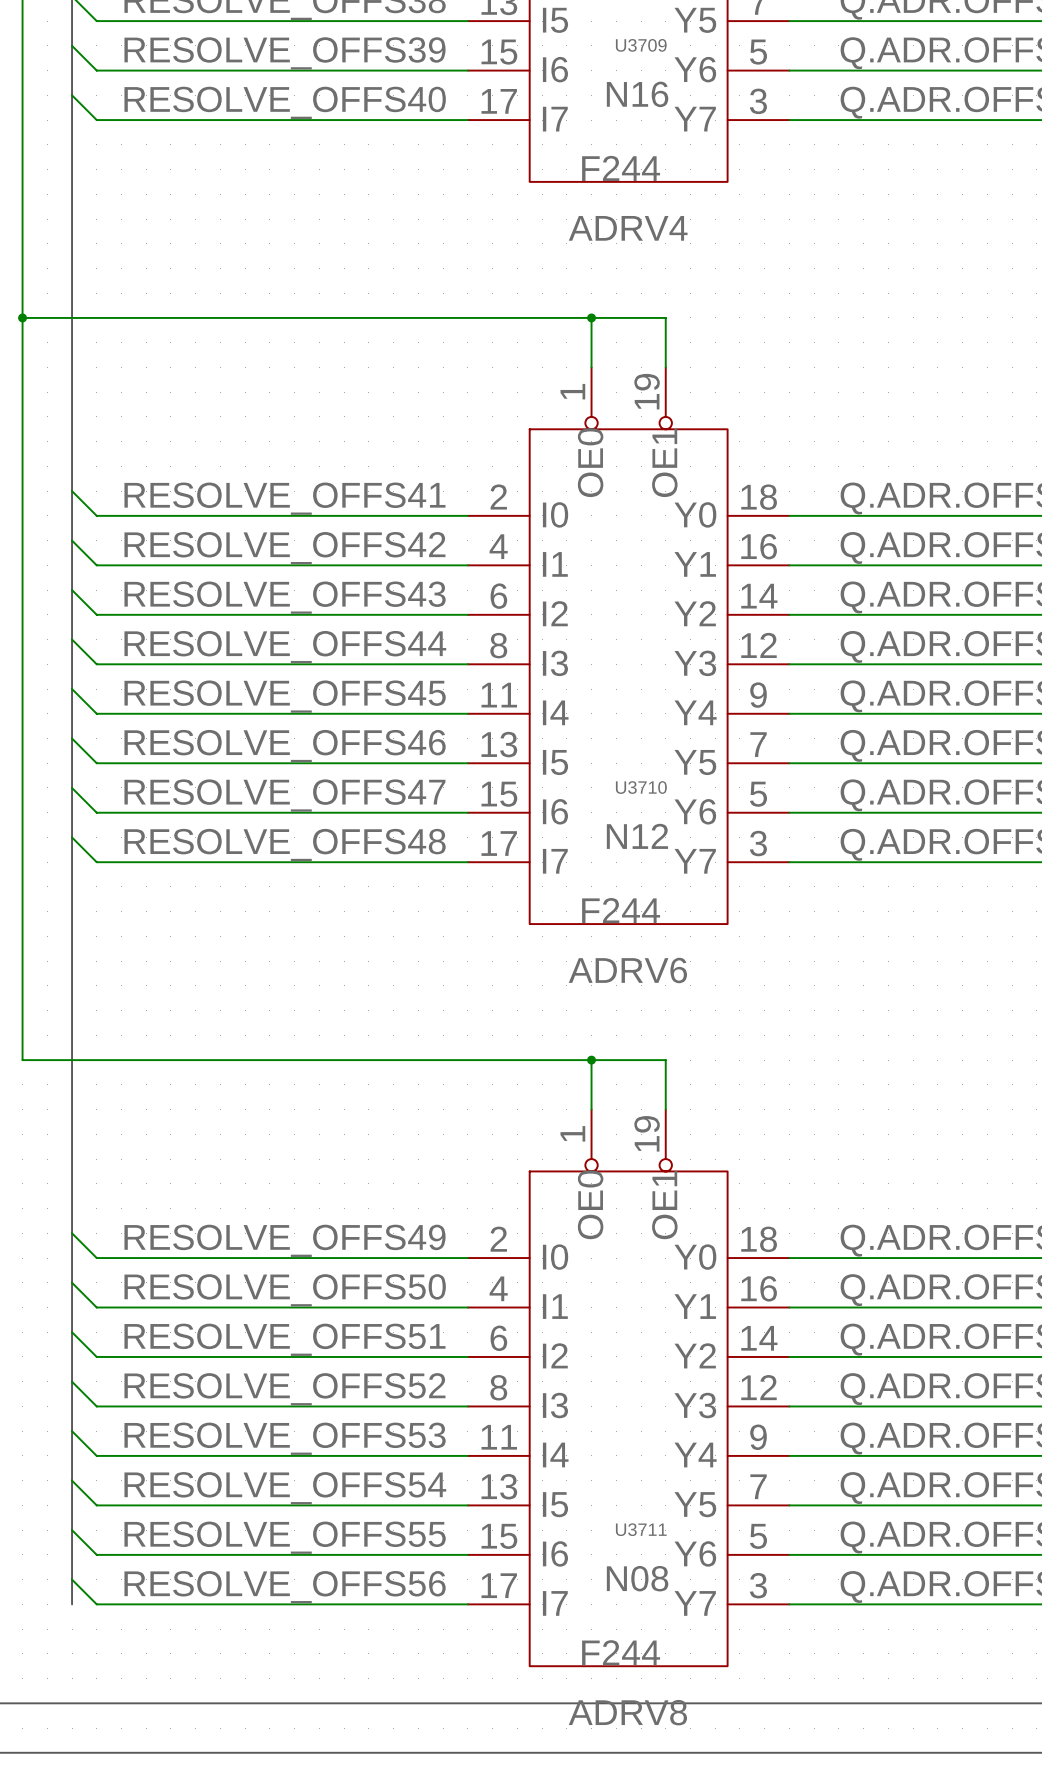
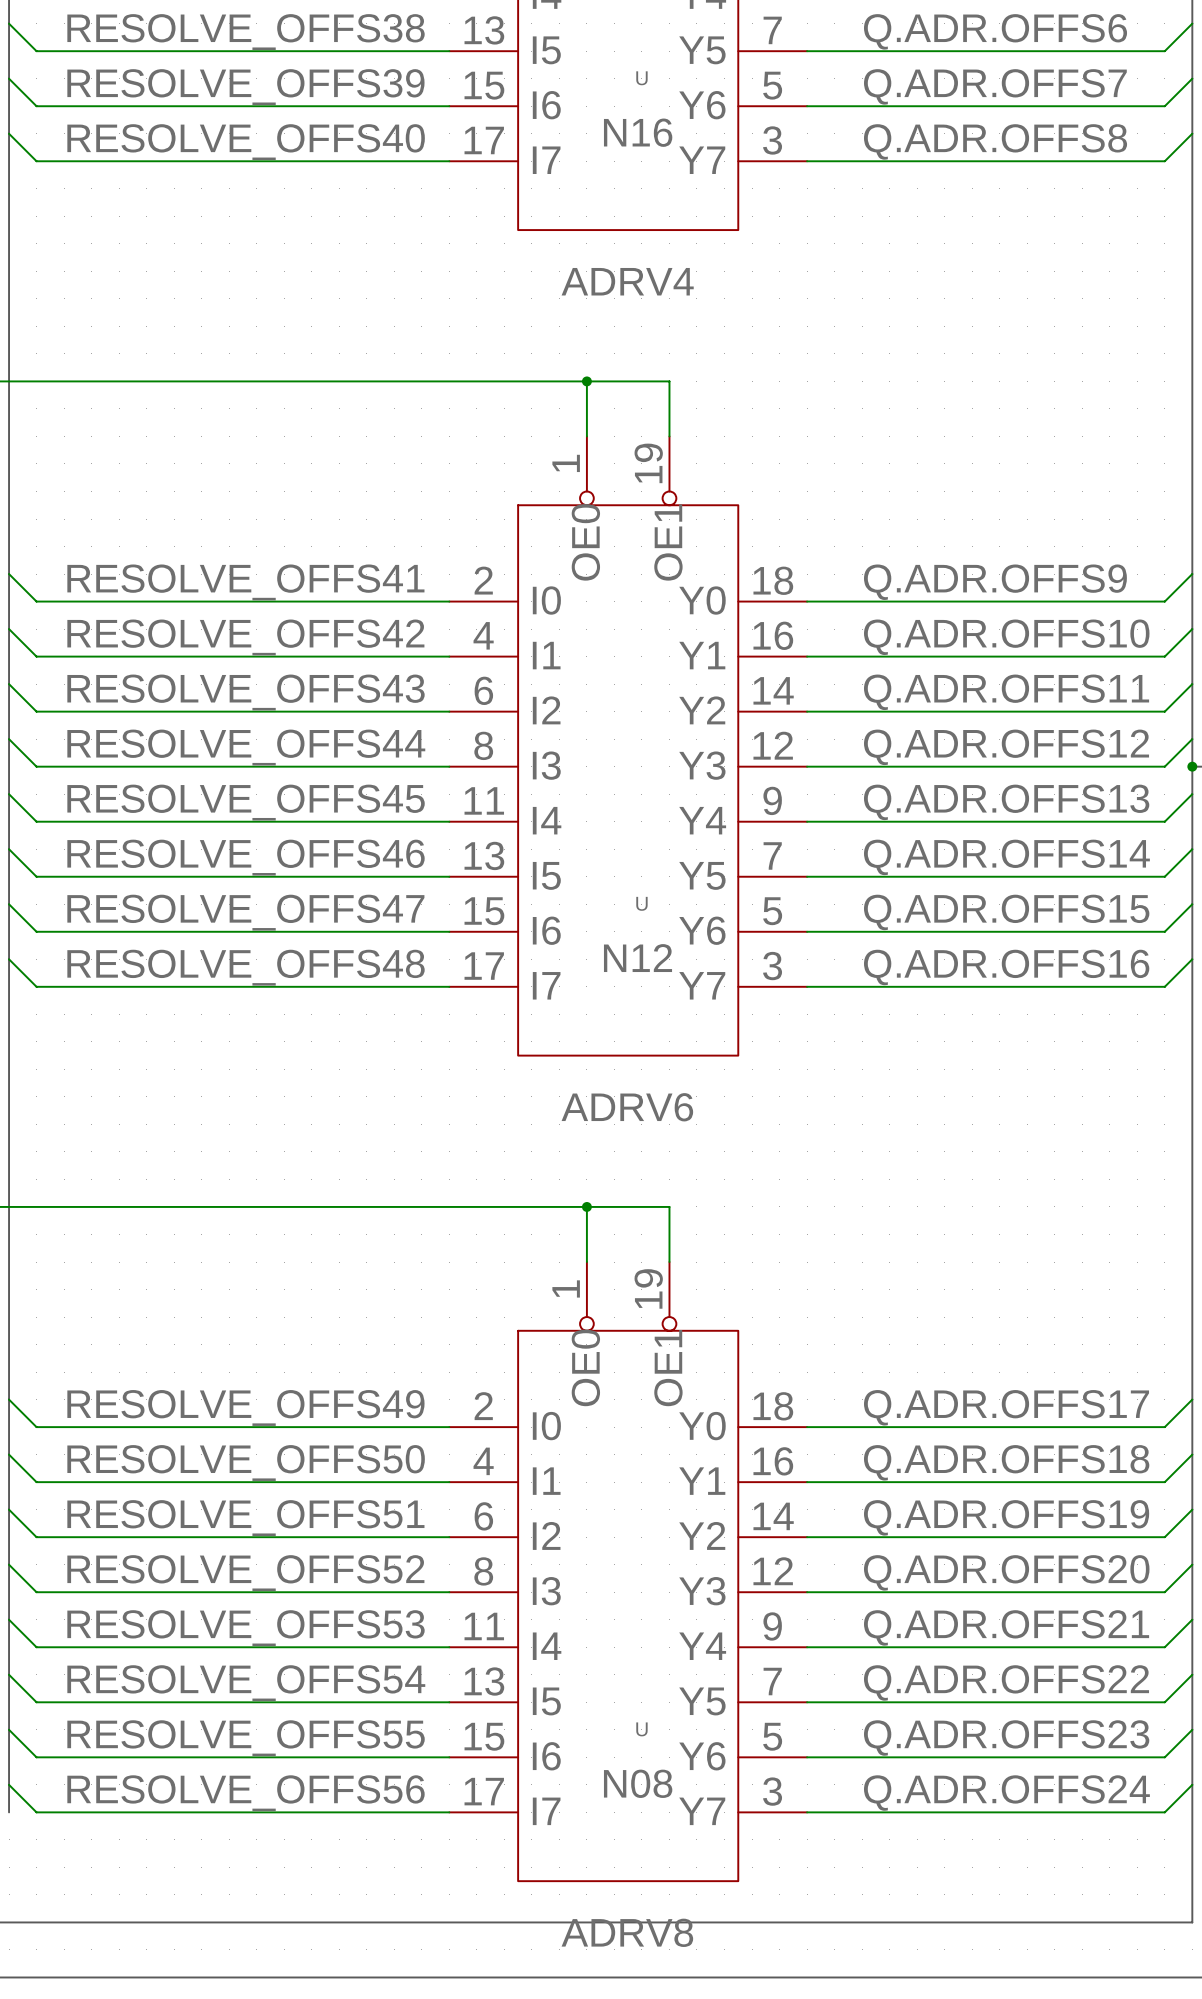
U3709 name: U3709 (641, 45) -> U (641, 78)
U3709 value: F244 (621, 168) -> none
U3710 name: U3710 (641, 787) -> U (641, 903)
U3710 value: F244 (621, 910) -> none
U3711 name: U3711 (641, 1529) -> U (641, 1729)
U3711 value: F244 (621, 1652) -> none

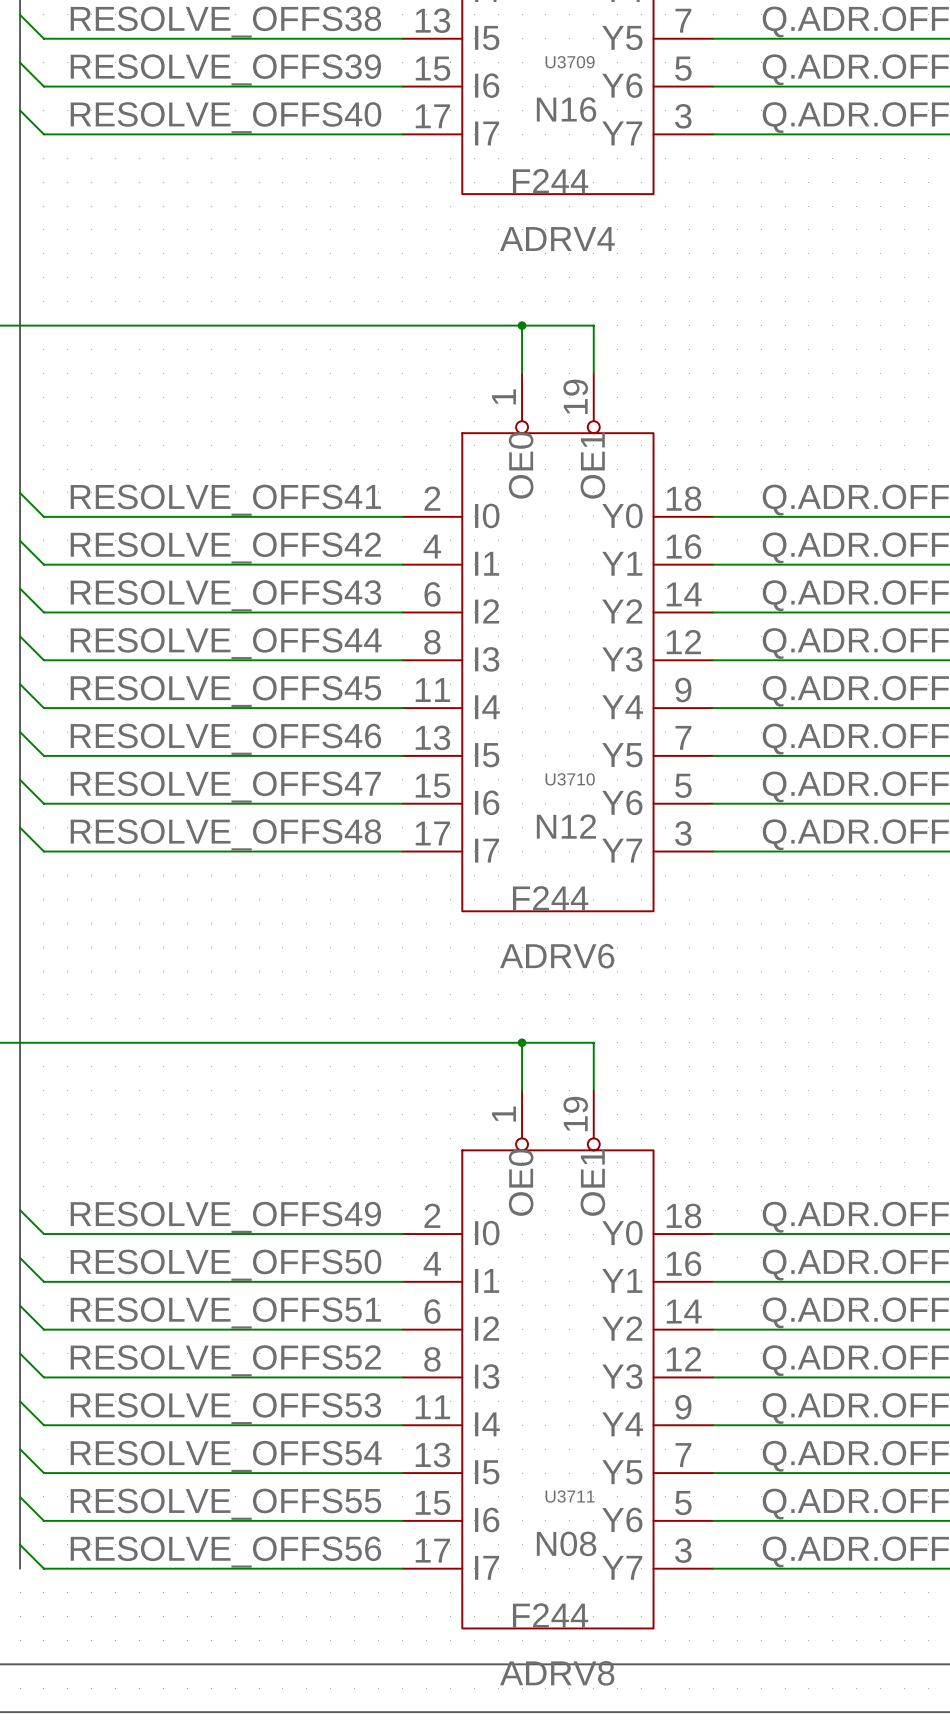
U name: U (641, 78) -> U3709 (570, 62)
U value: none -> F244 (550, 181)
U name: U (641, 903) -> U3710 (570, 779)
U value: none -> F244 (550, 898)
U name: U (641, 1729) -> U3711 (570, 1496)
U value: none -> F244 (550, 1615)

